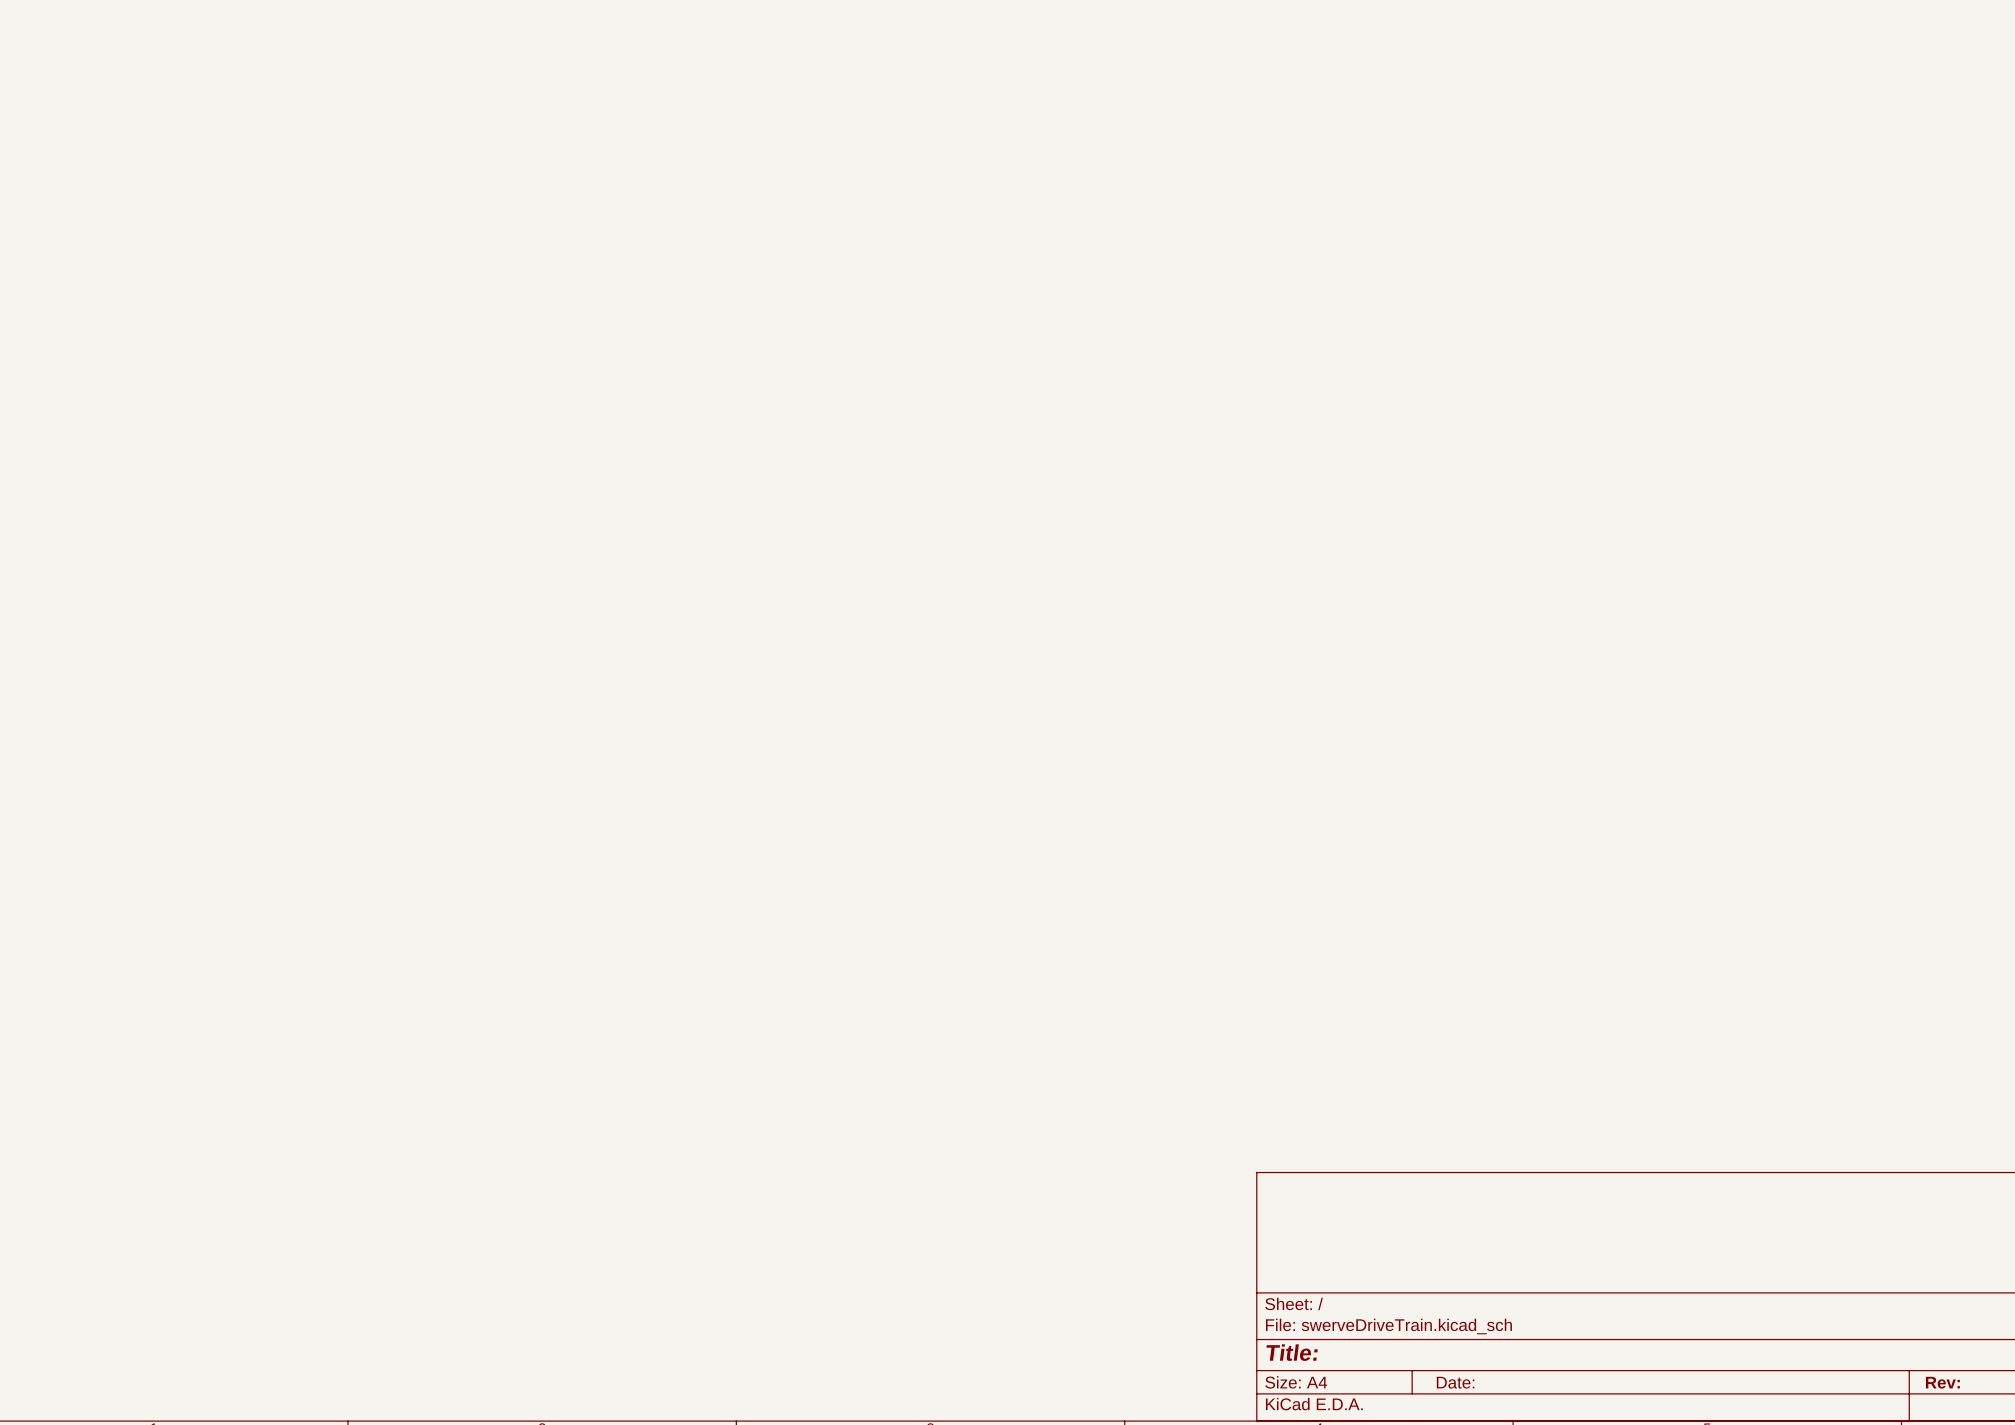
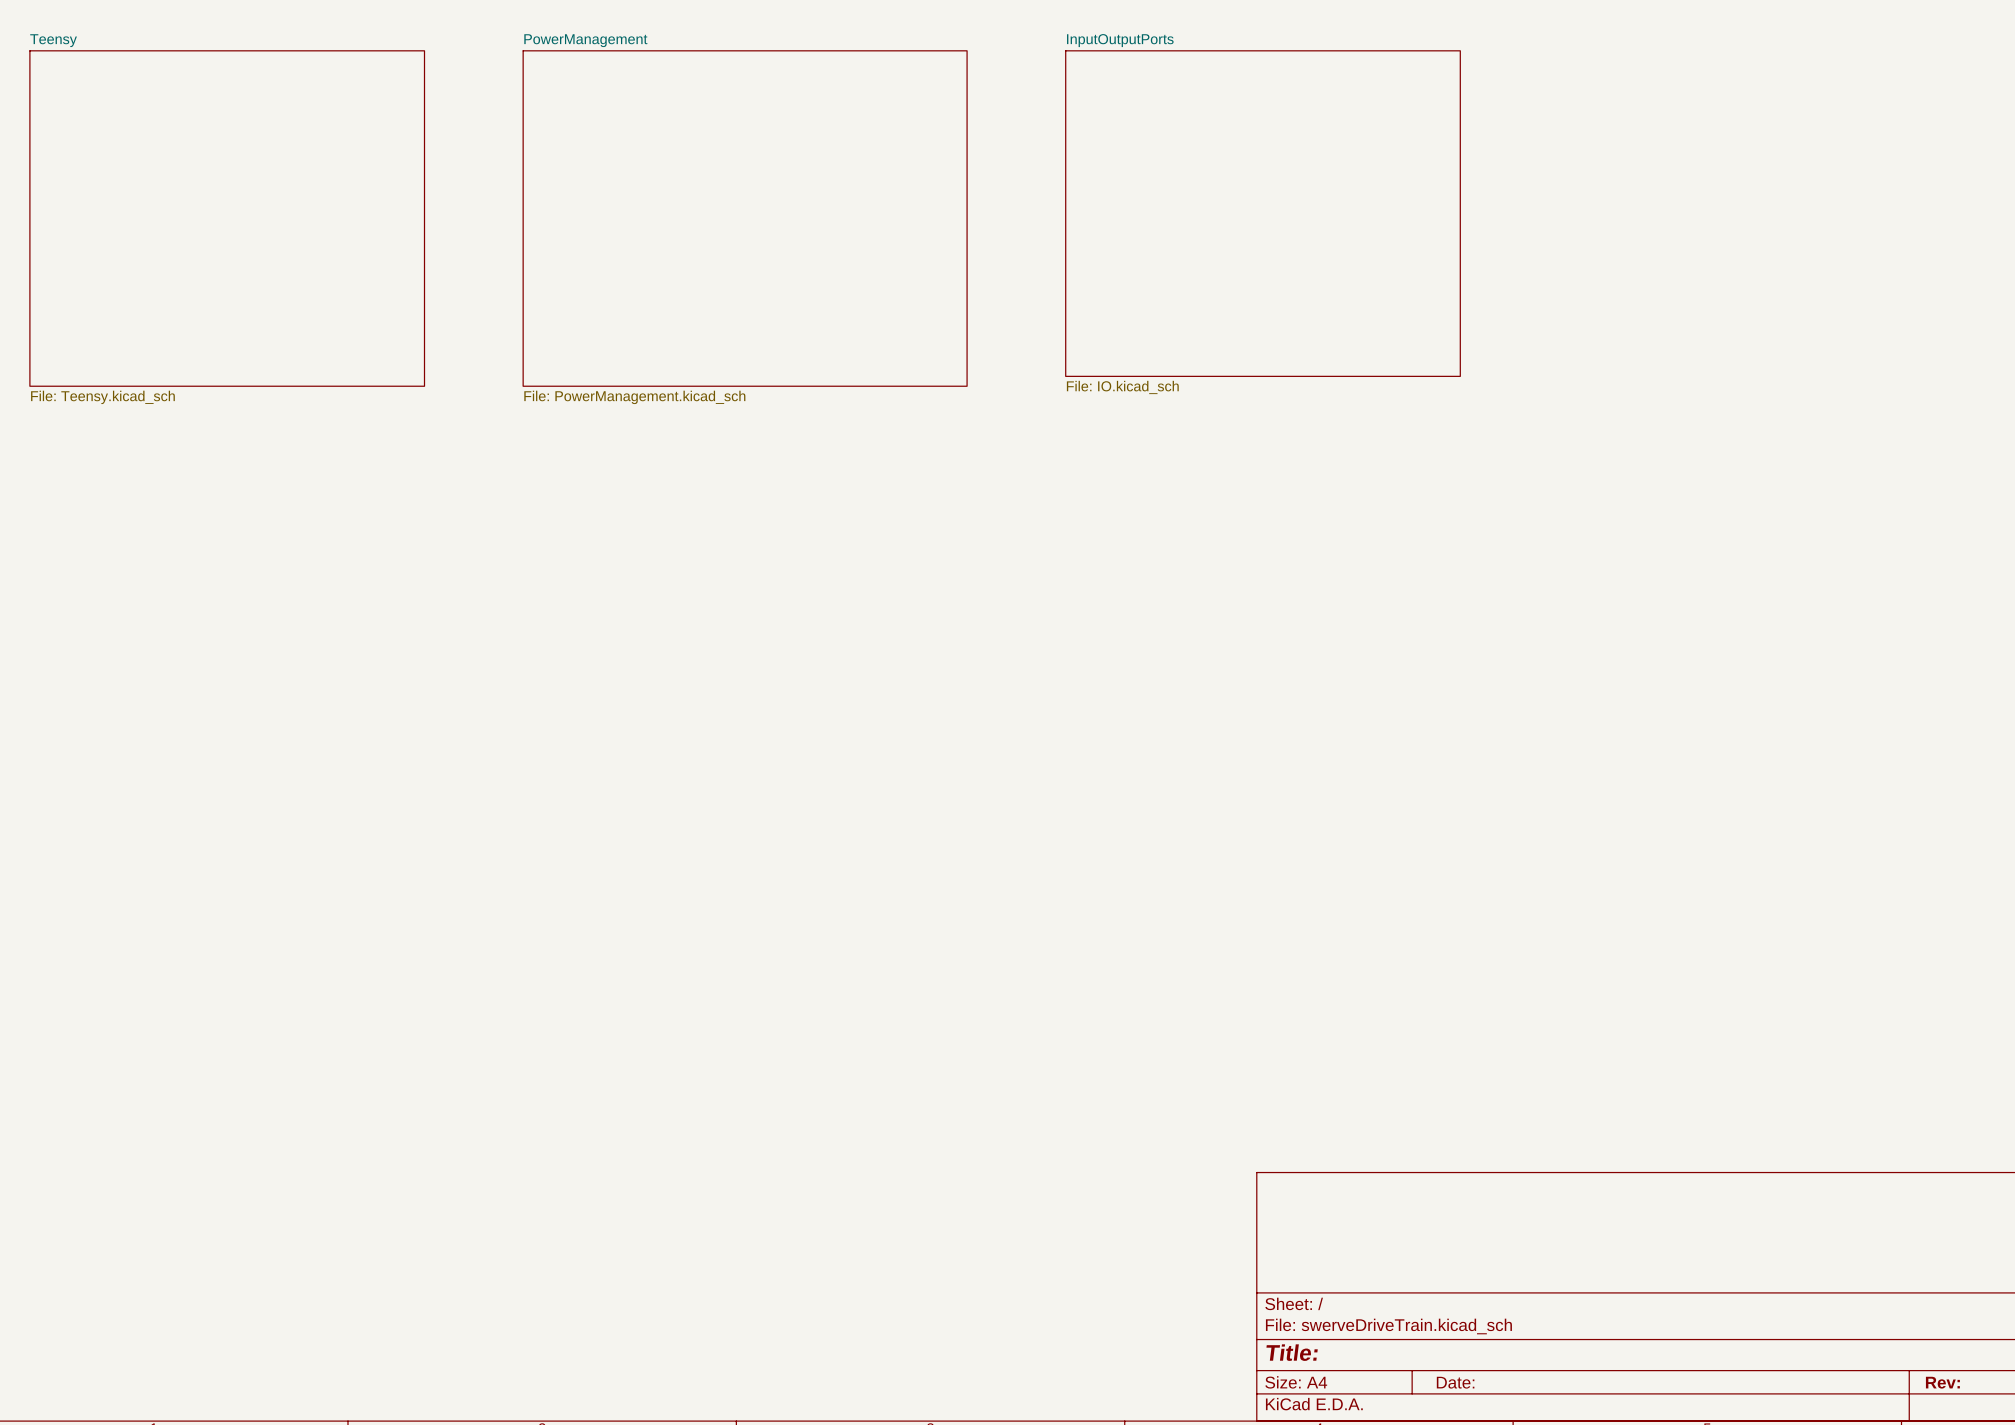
sheet InputOutputPorts: none -> File: IO.kicad_sch (1263, 213)
sheet Teensy: none -> File: Teensy.kicad_sch (227, 218)
sheet PowerManagement: none -> File: PowerManagement.kicad_sch (745, 218)

